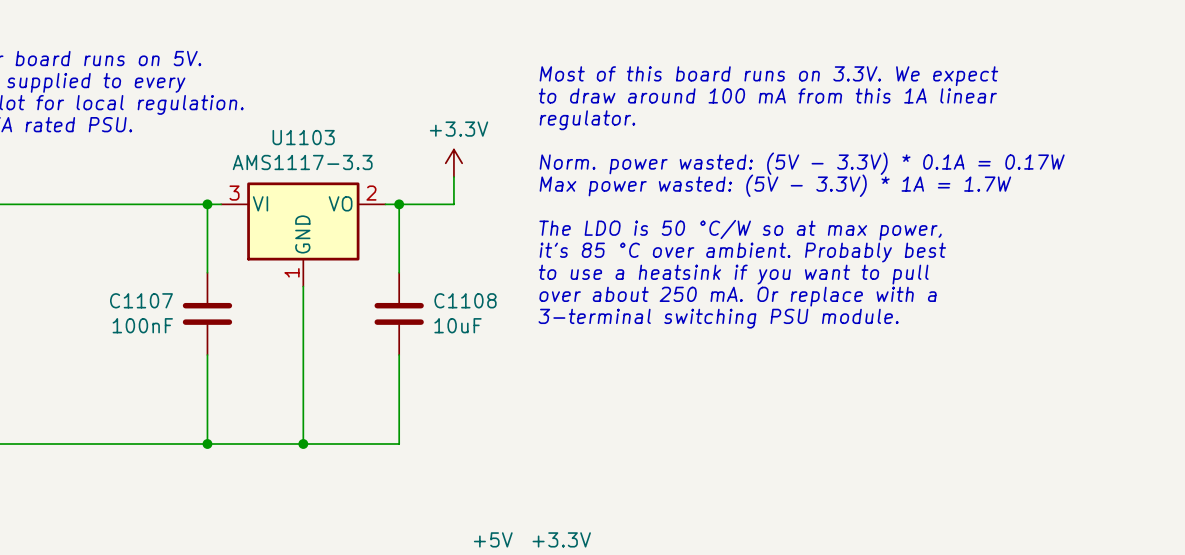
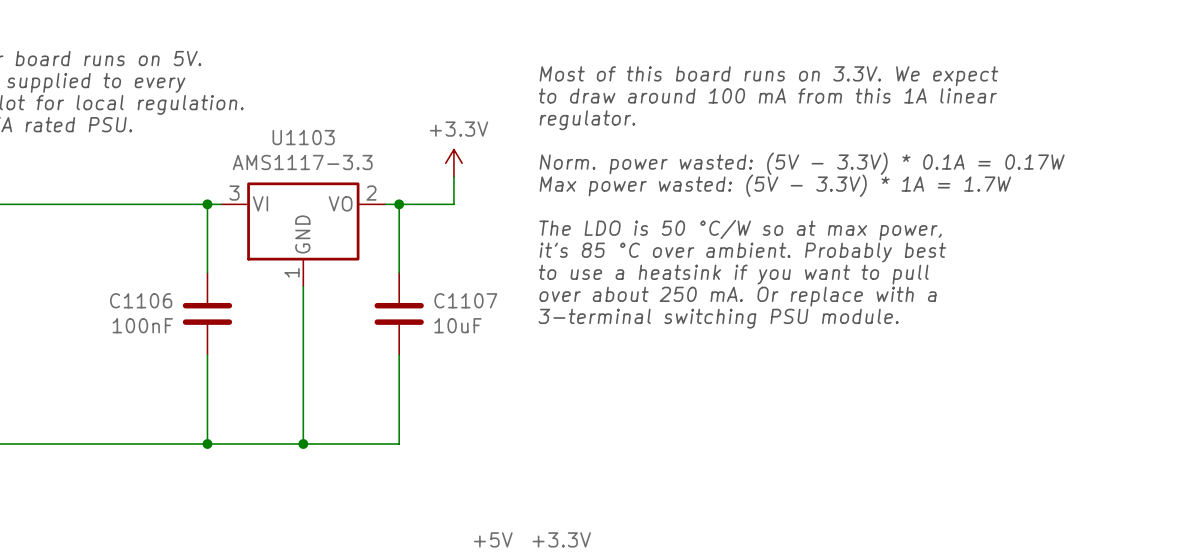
C1107 name: C1107 (141, 300) -> C1106 (141, 300)
C1108 name: C1108 (465, 300) -> C1107 (465, 300)

